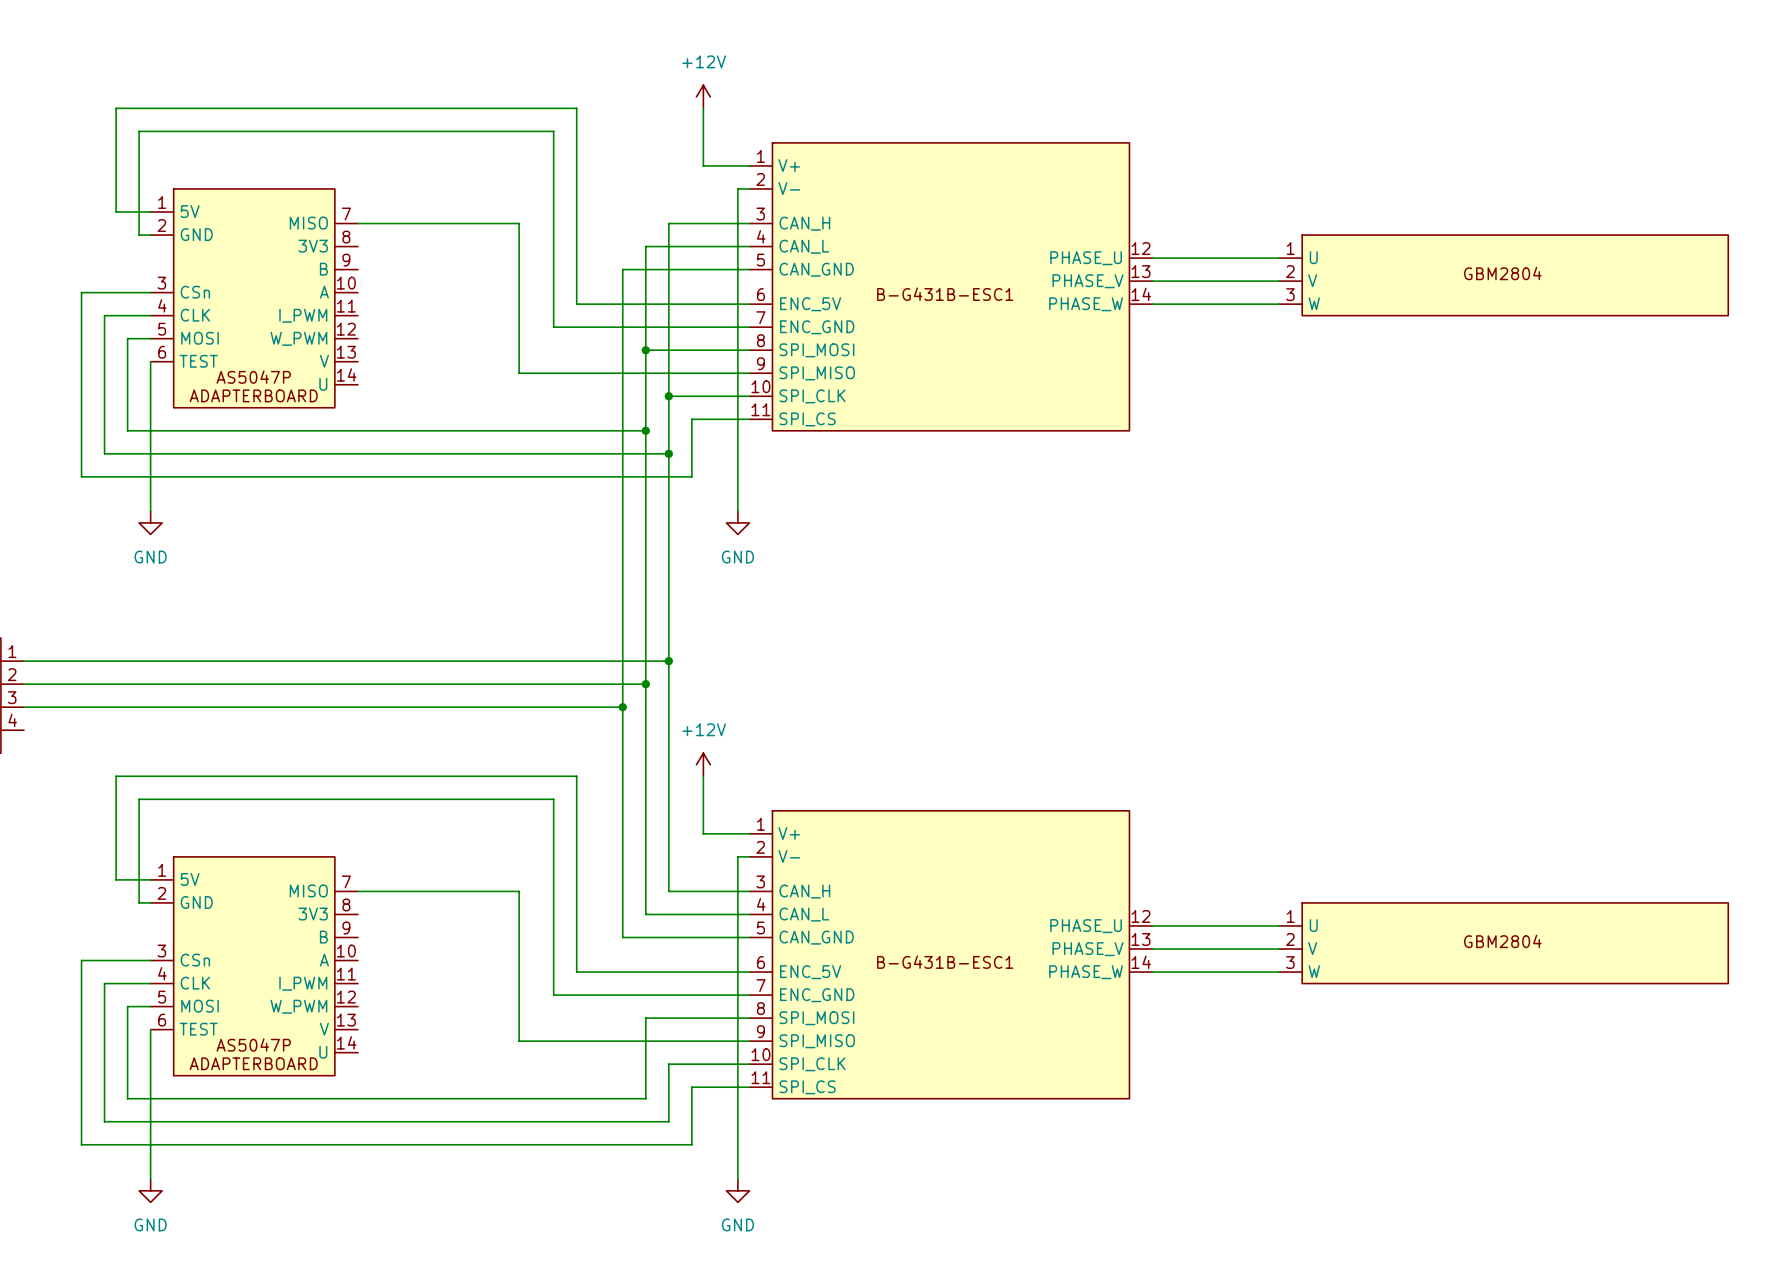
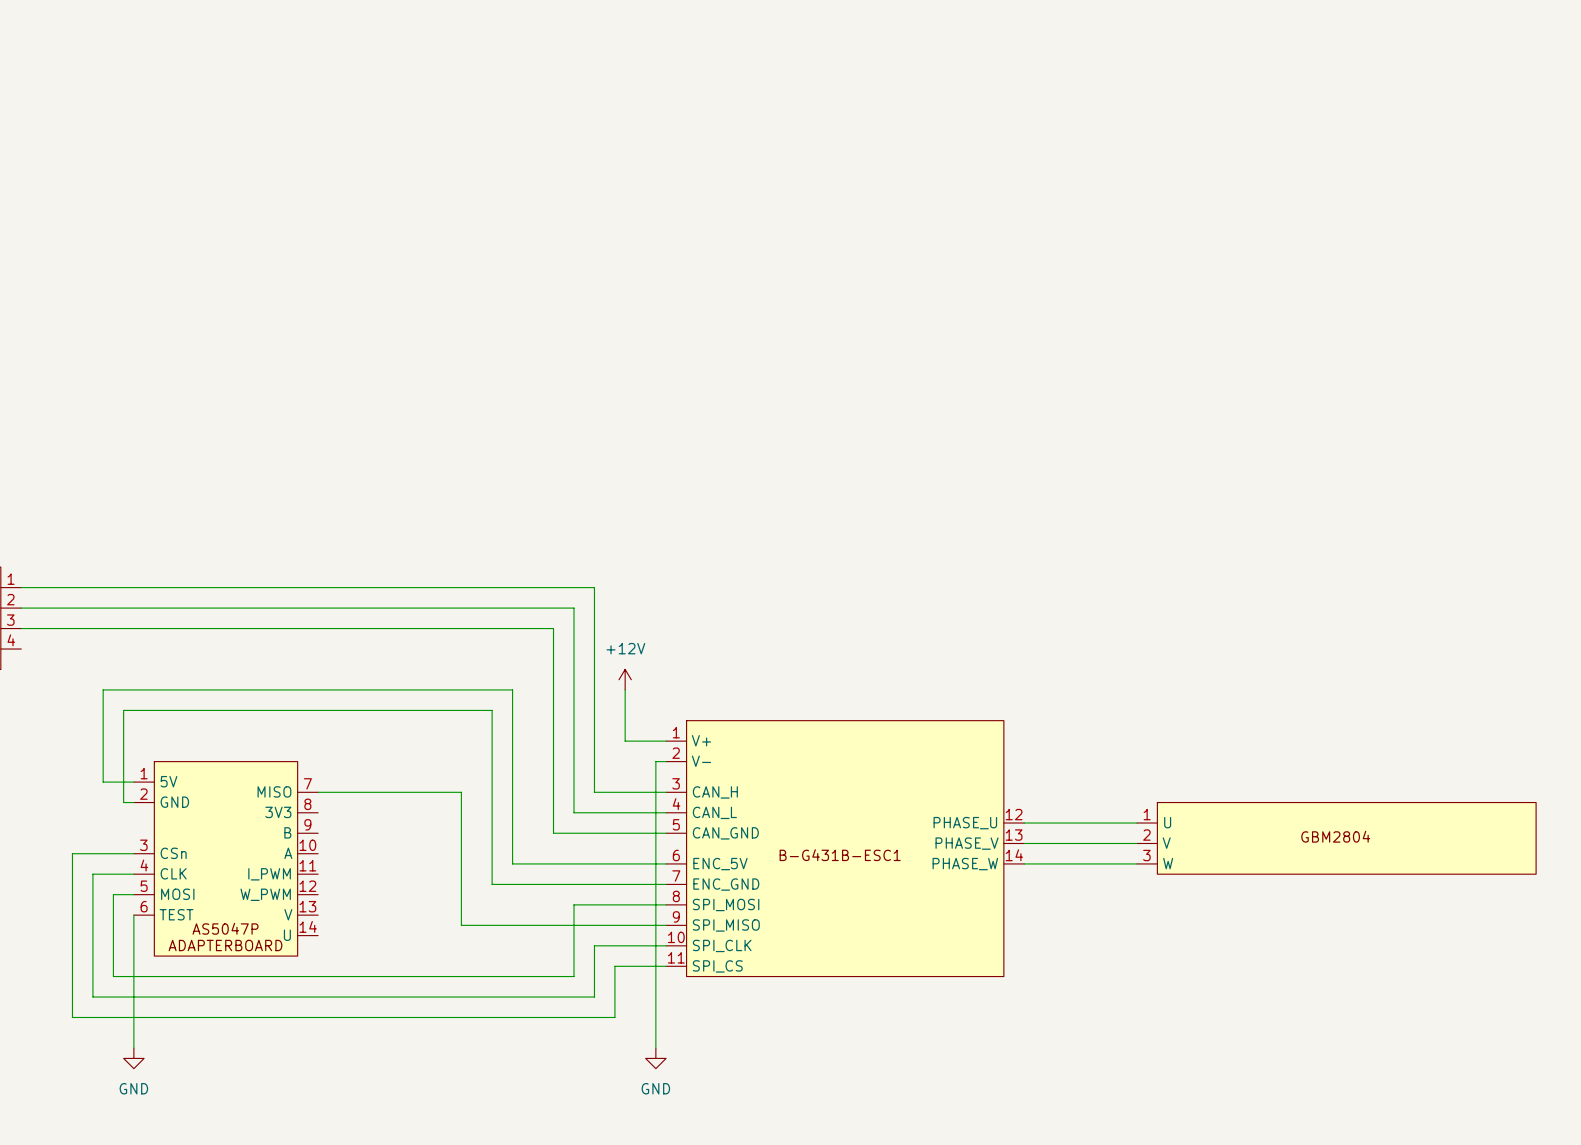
power symbol: +12V (703, 96) -> none
wire: (703, 108) (703, 165) (749, 165) -> none
wire: (749, 188) (737, 188) (737, 511) -> none
wire: (150, 212) (116, 212) (116, 108) (576, 108) (576, 304) (749, 304) -> none
wire: (357, 223) (519, 223) (519, 373) (749, 373) -> none
wire: (749, 223) (668, 223) (668, 661) -> none
wire: (150, 235) (139, 235) (139, 131) (553, 131) (553, 327) (749, 327) -> none
wire: (749, 246) (645, 246) (645, 684) -> none
wire: (1152, 258) (1279, 258) -> none
wire: (749, 269) (622, 269) (622, 707) -> none
part: (1503, 275) -> none
wire: (1152, 281) (1279, 281) -> none
part: (950, 286) -> none
wire: (150, 292) (81, 292) (81, 476) (691, 476) (691, 419) (749, 419) -> none
part: (254, 298) -> none
wire: (1152, 304) (1279, 304) -> none
wire: (150, 315) (104, 315) (104, 453) (668, 453) -> none
wire: (150, 338) (127, 338) (127, 430) (645, 430) -> none
wire: (645, 350) (749, 350) -> none
junction: (645, 350) -> none
wire: (150, 361) (150, 511) -> none
wire: (668, 396) (749, 396) -> none
junction: (668, 396) -> none
junction: (645, 430) -> none
junction: (668, 453) -> none
power symbol: GND (150, 522) -> none
power symbol: GND (737, 522) -> none
junction: (668, 661) -> none
junction: (645, 684) -> none
junction: (622, 707) -> none

